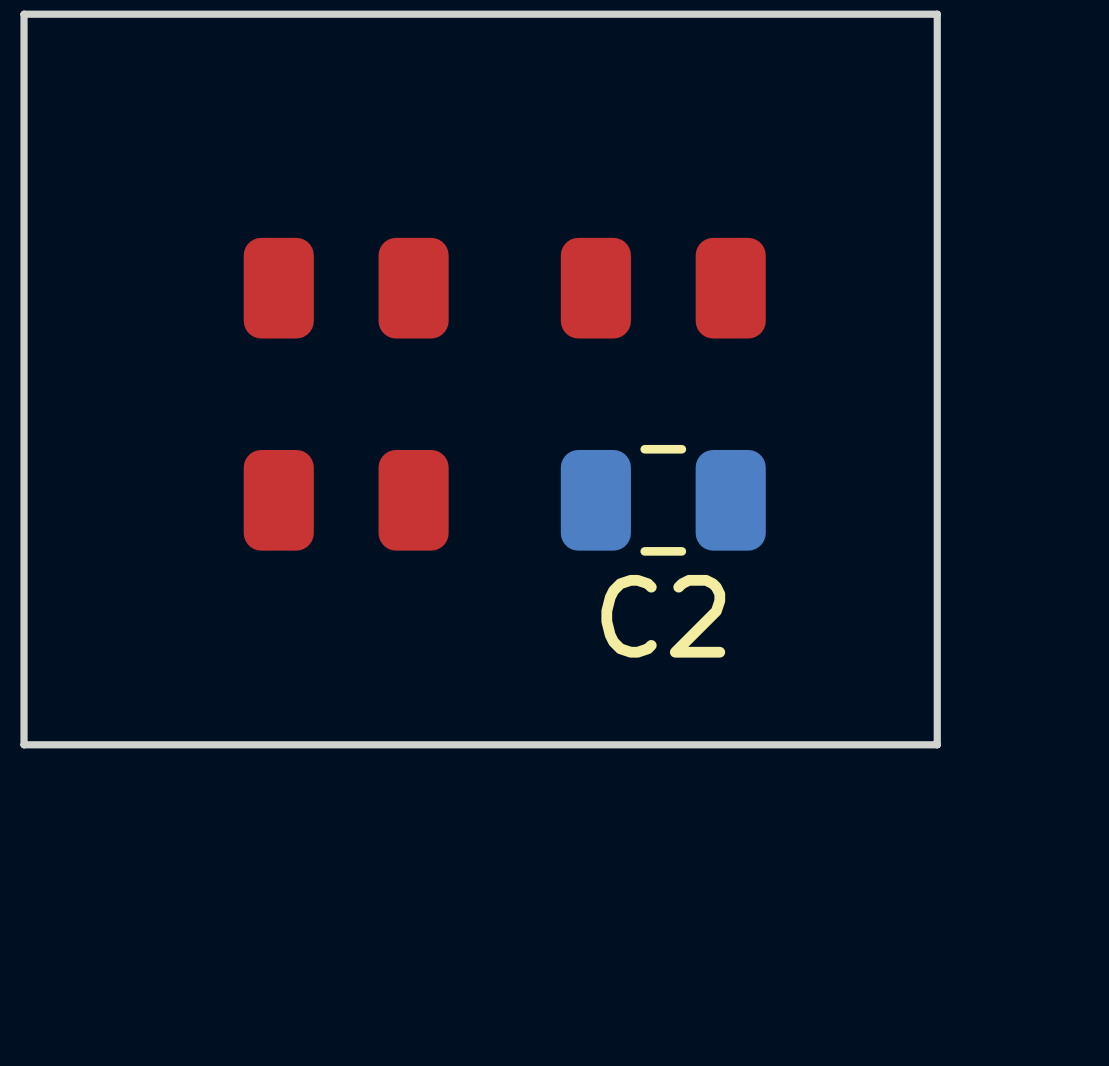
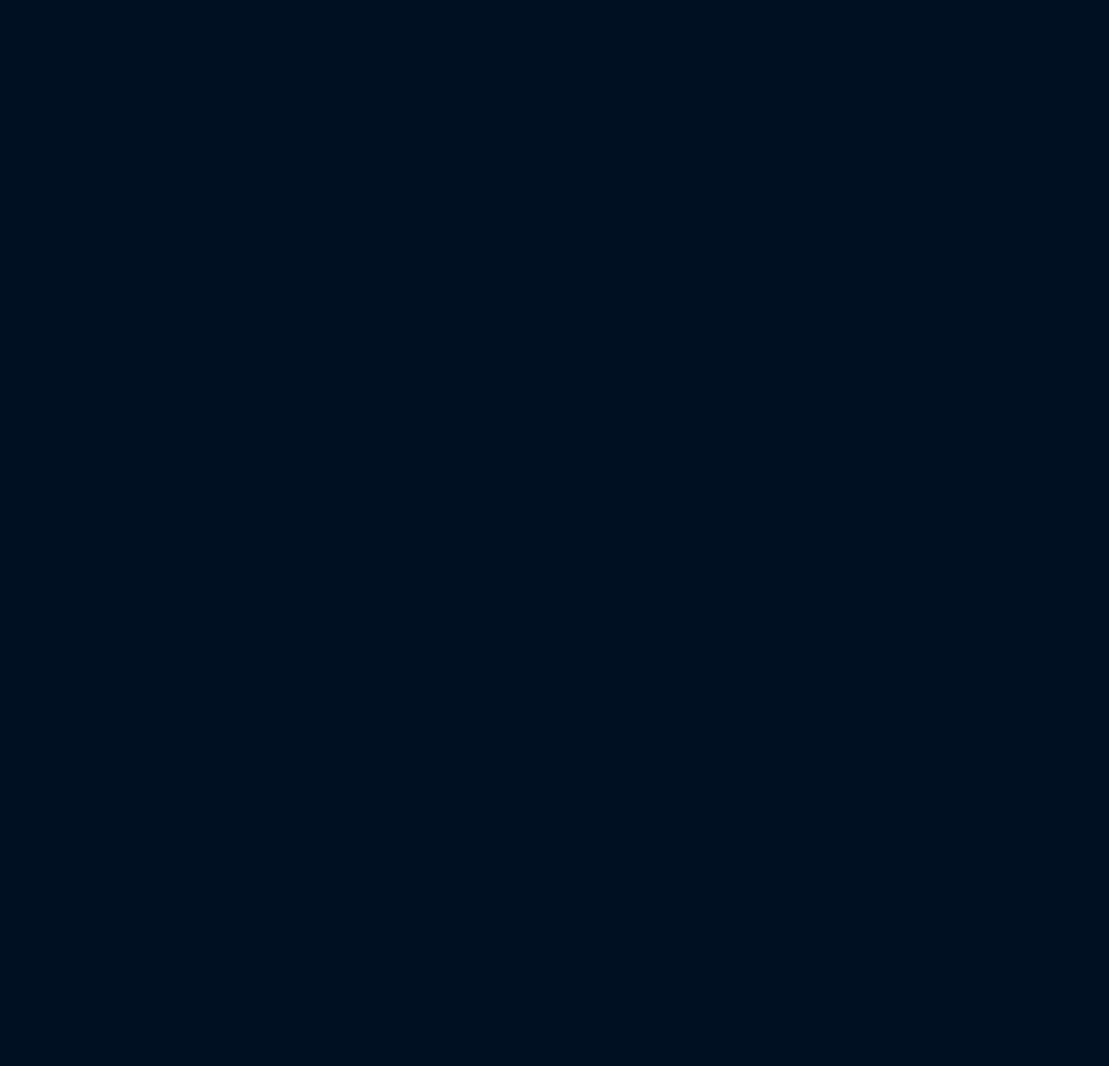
board edge: (937, 14) (937, 744) (24, 744) (24, 14) (937, 14) -> none
part: (346, 288) -> none
part: (663, 288) -> none
part: (346, 500) -> none
C2: (663, 500) -> none

